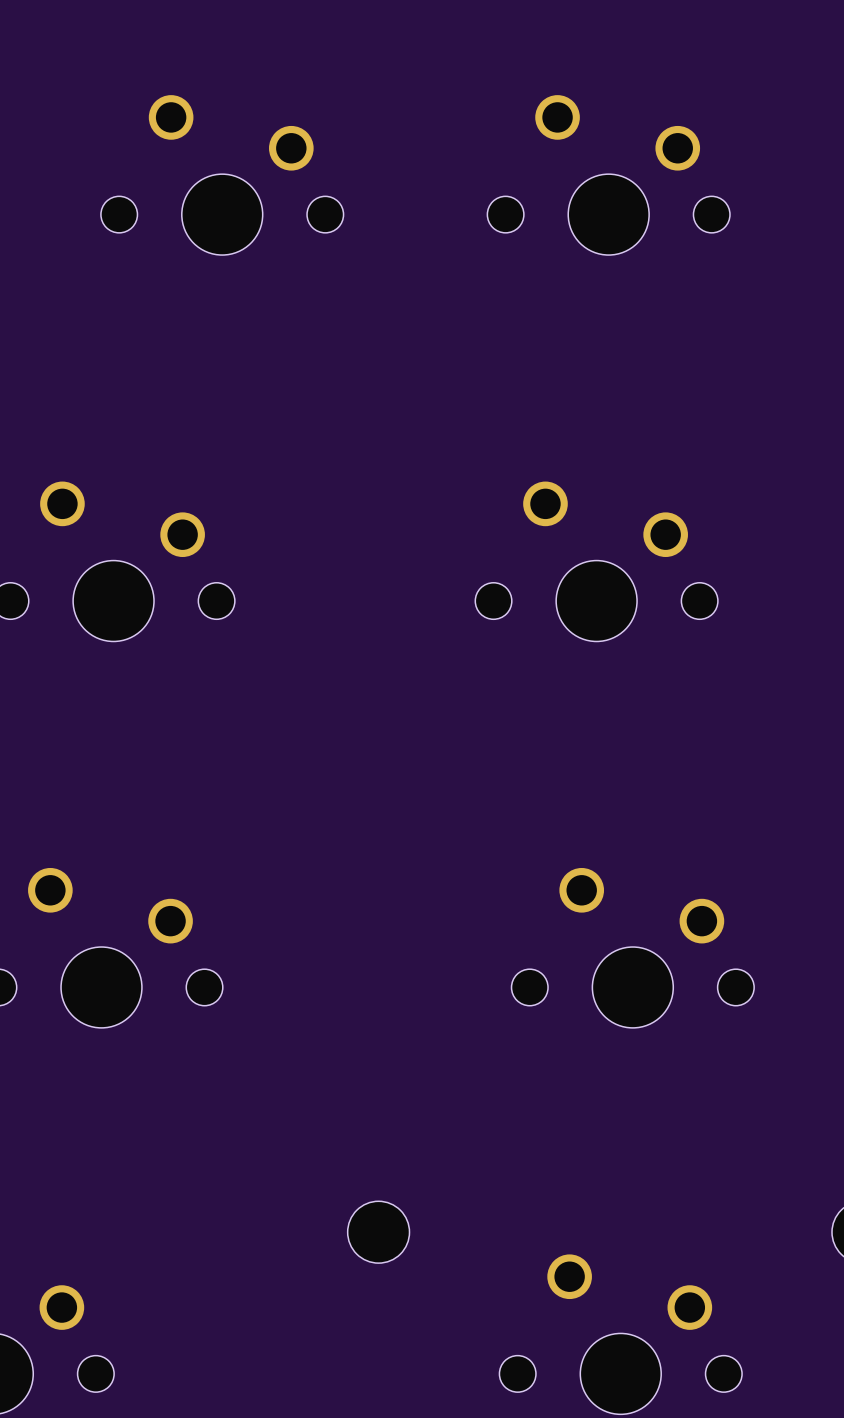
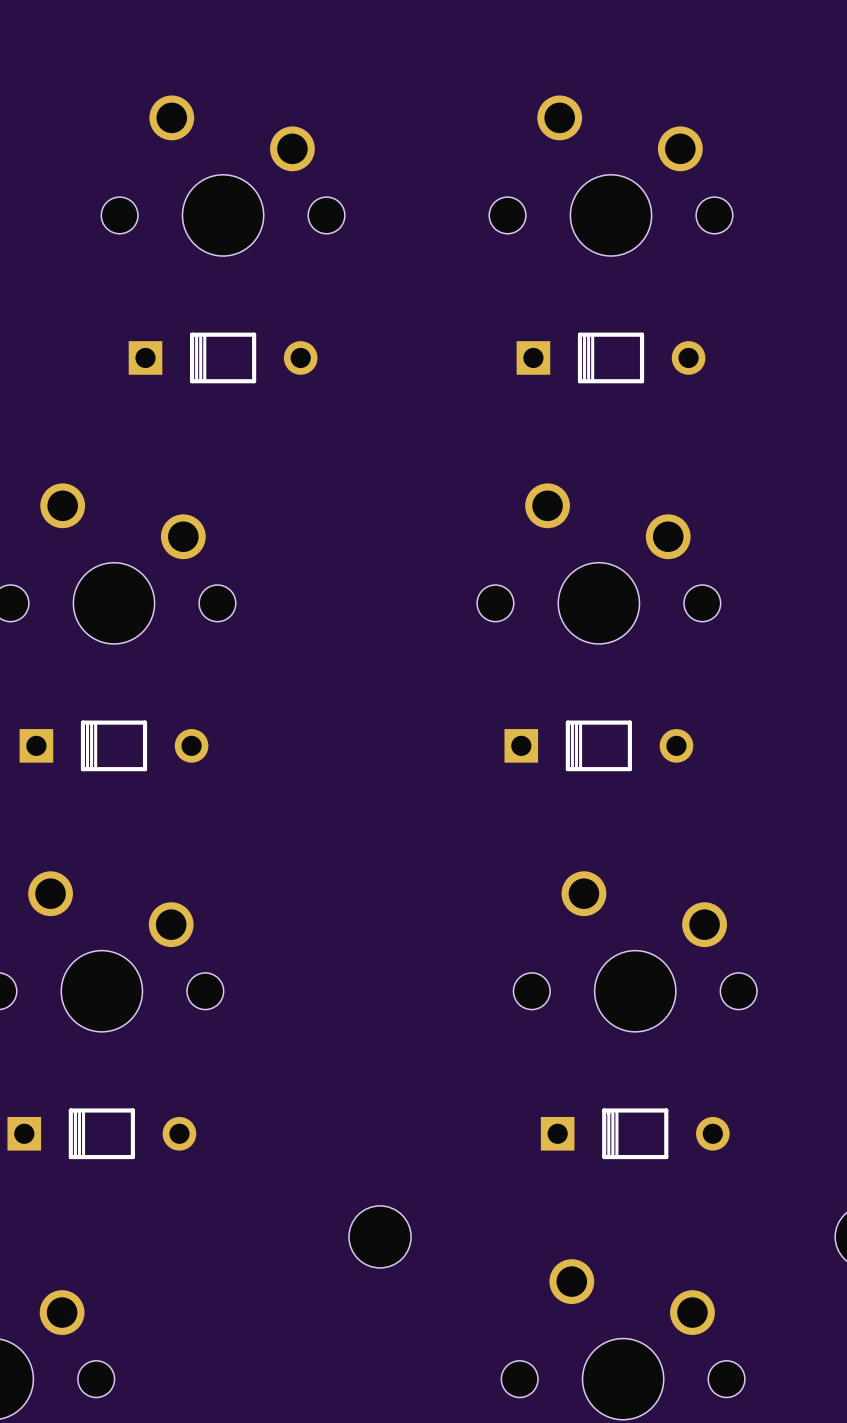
part: none -> (223, 357)
part: none -> (611, 357)
part: none -> (113, 745)
part: none -> (598, 745)
part: none -> (101, 1133)
part: none -> (635, 1133)

